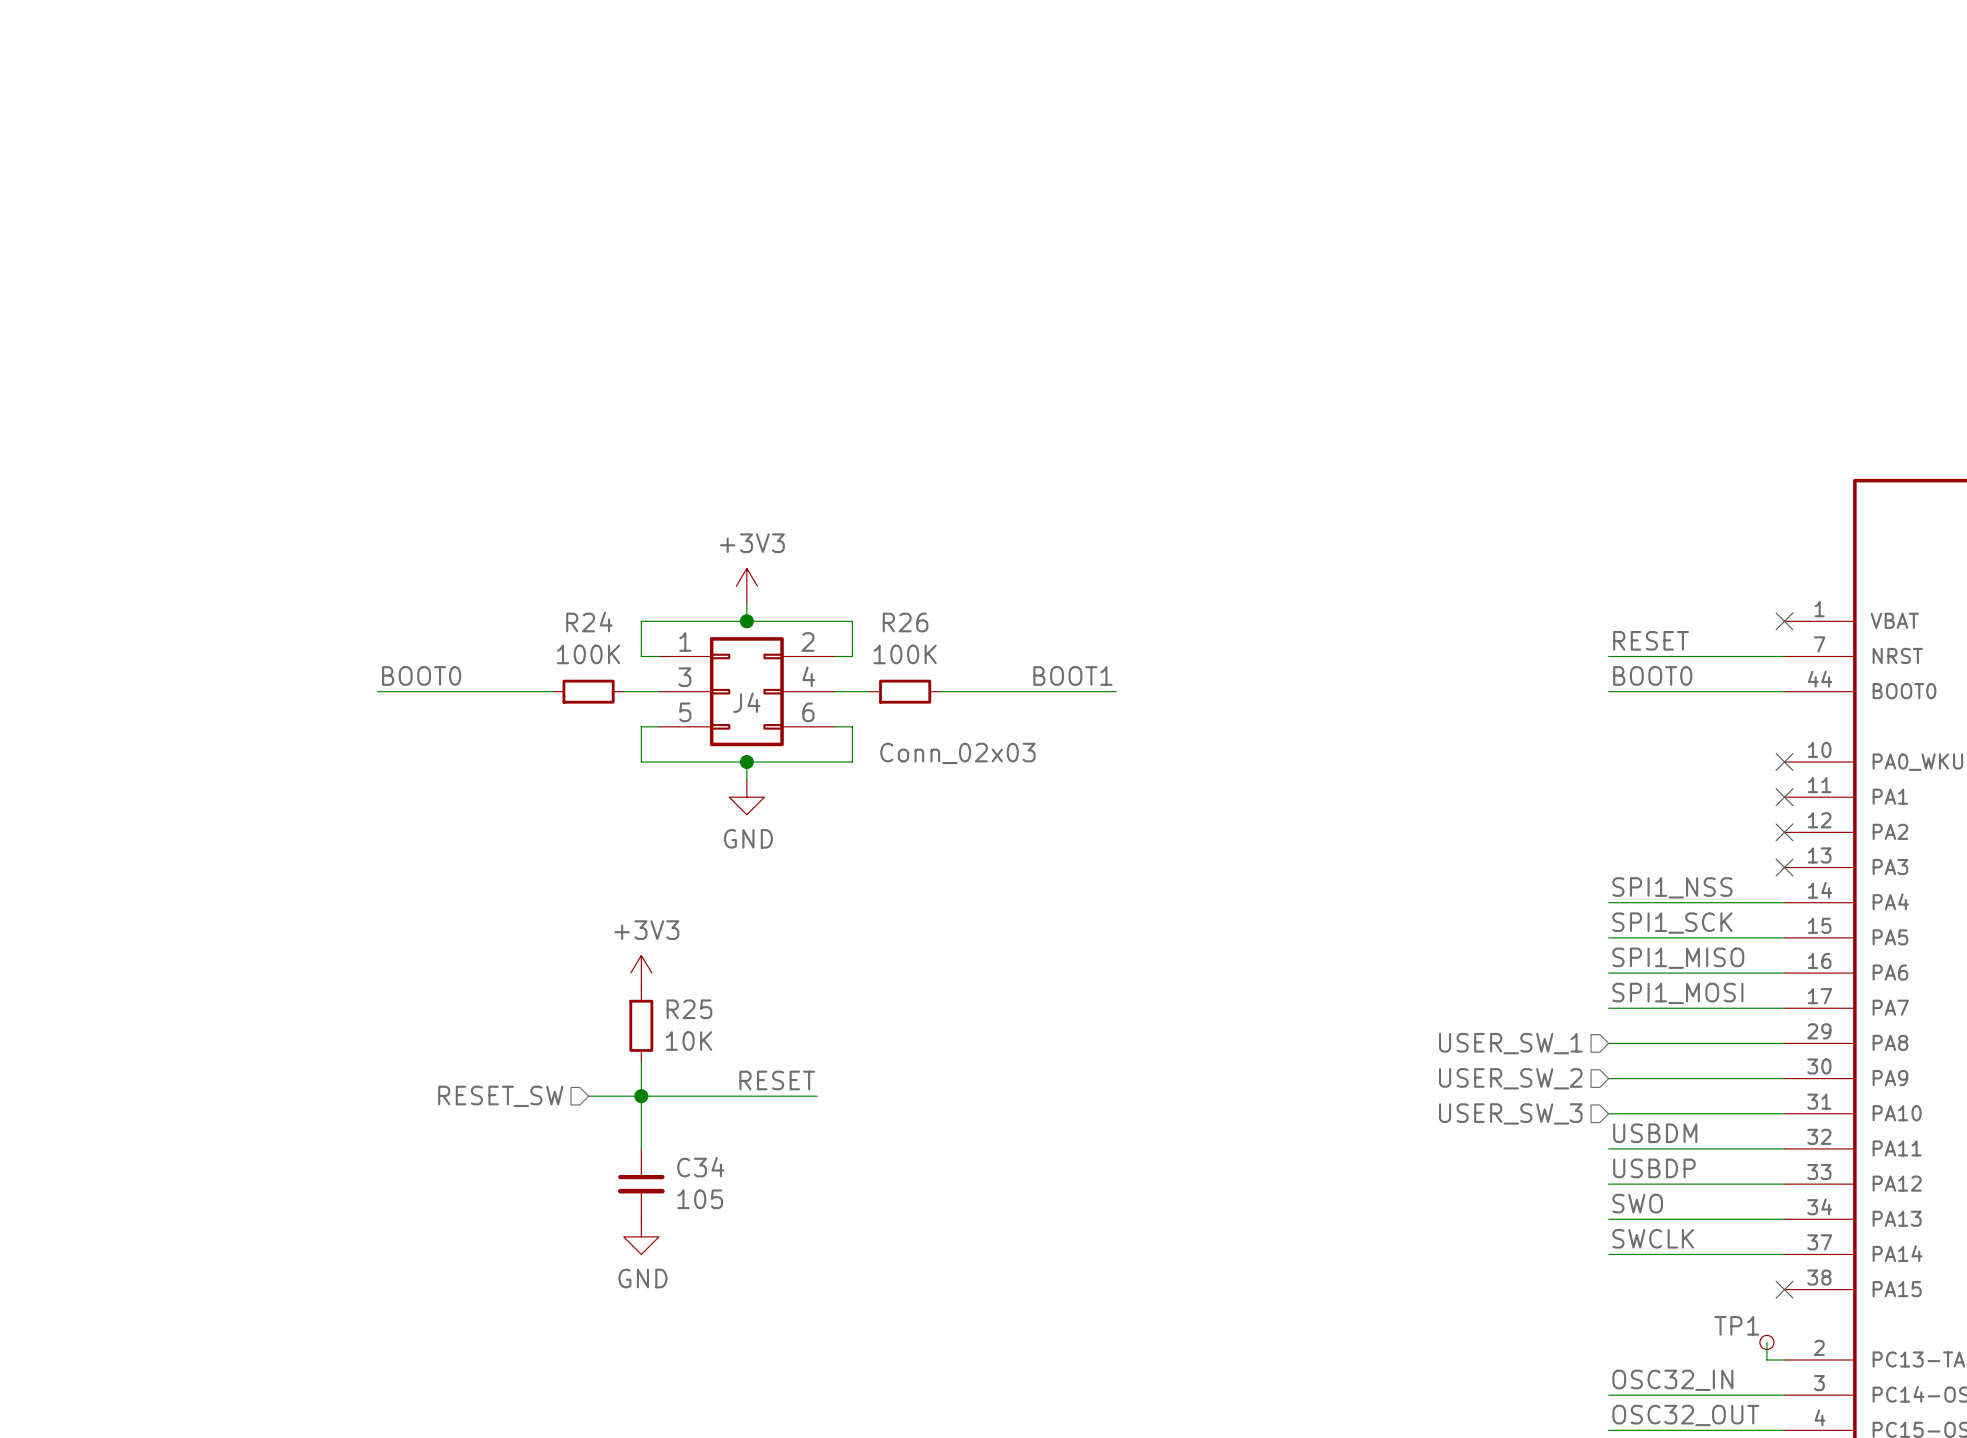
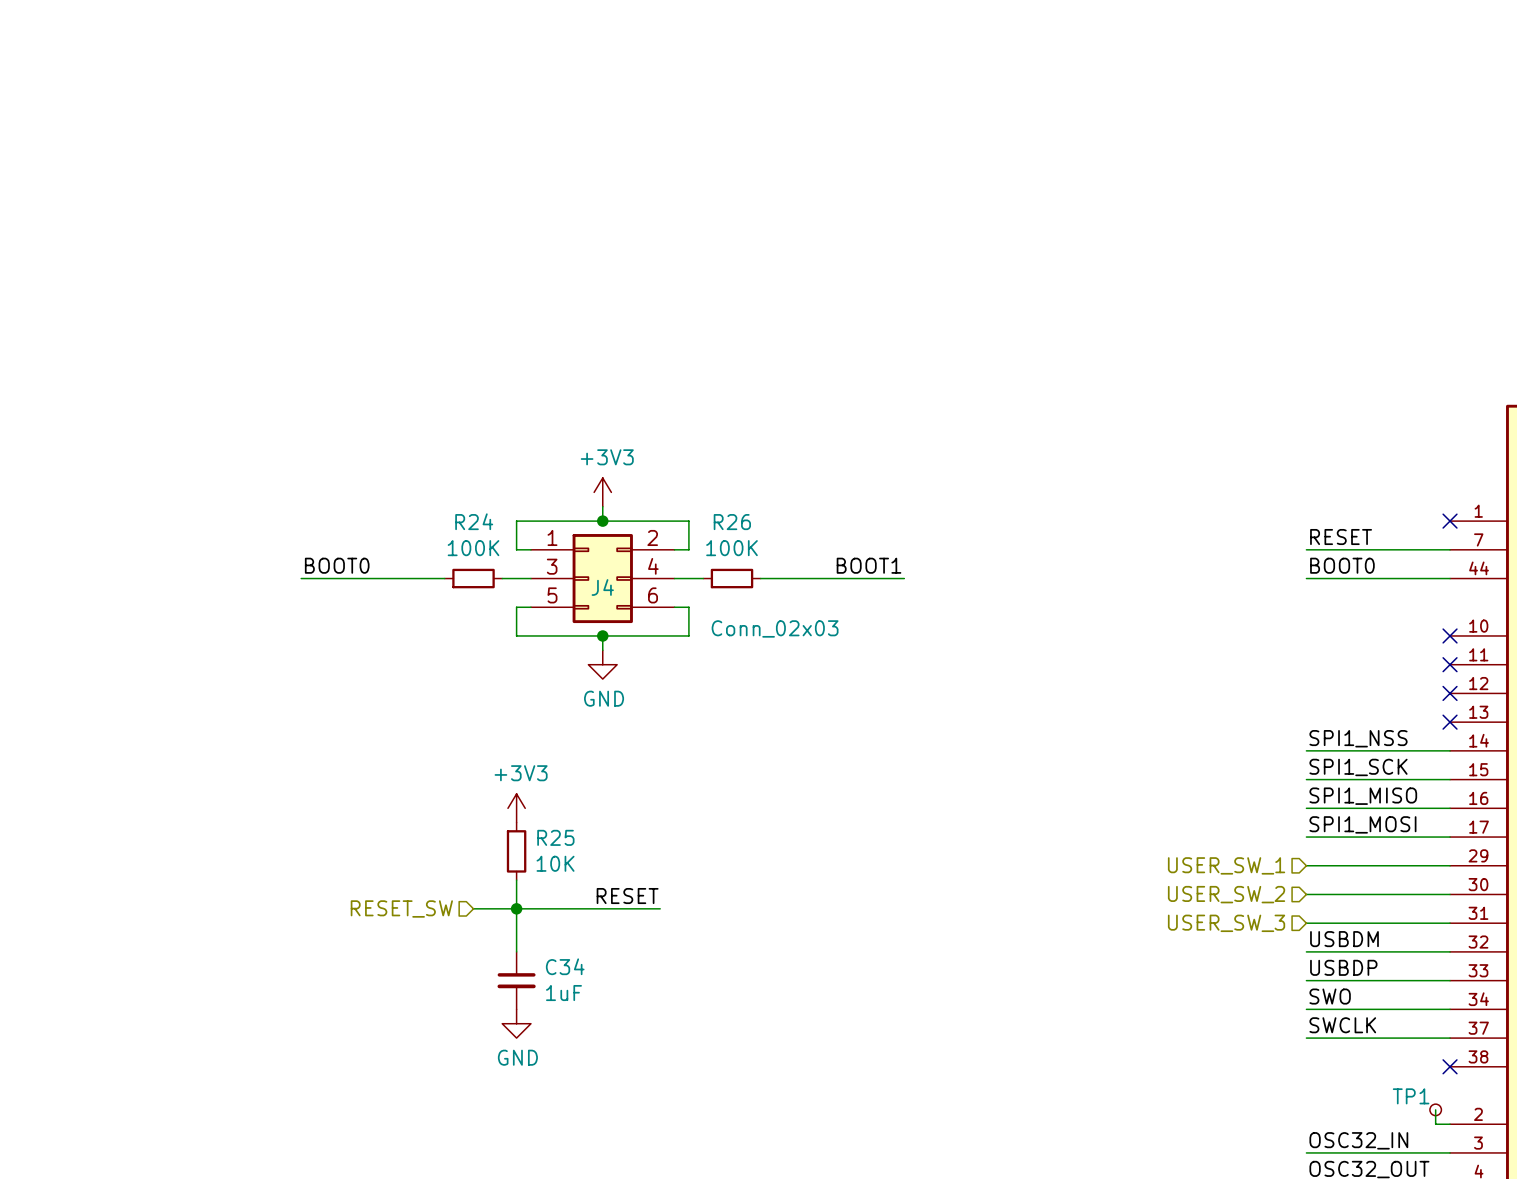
C34 value: 105 (700, 1199) -> 1uF (563, 993)

